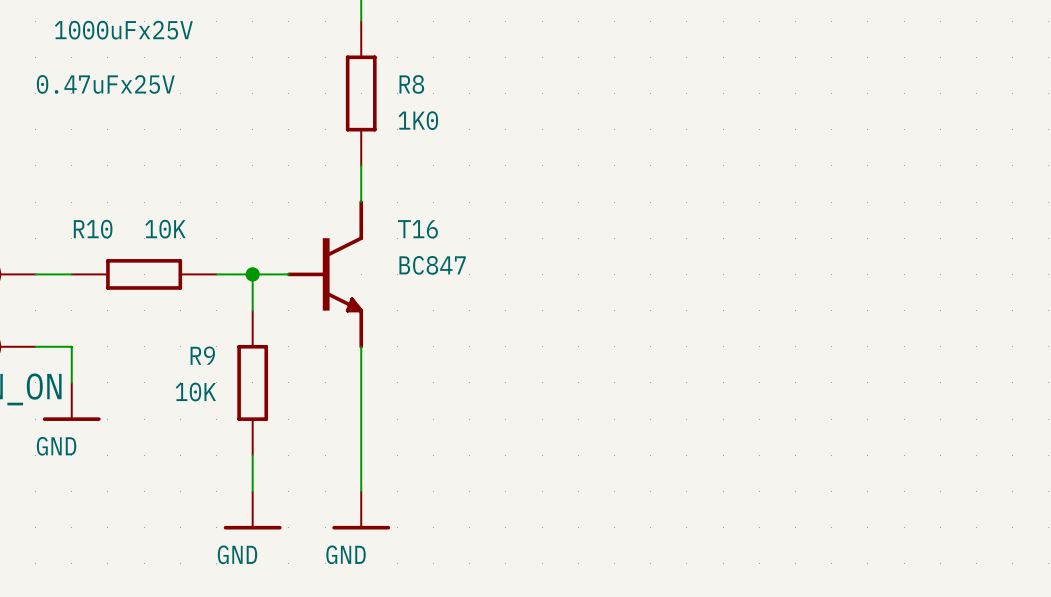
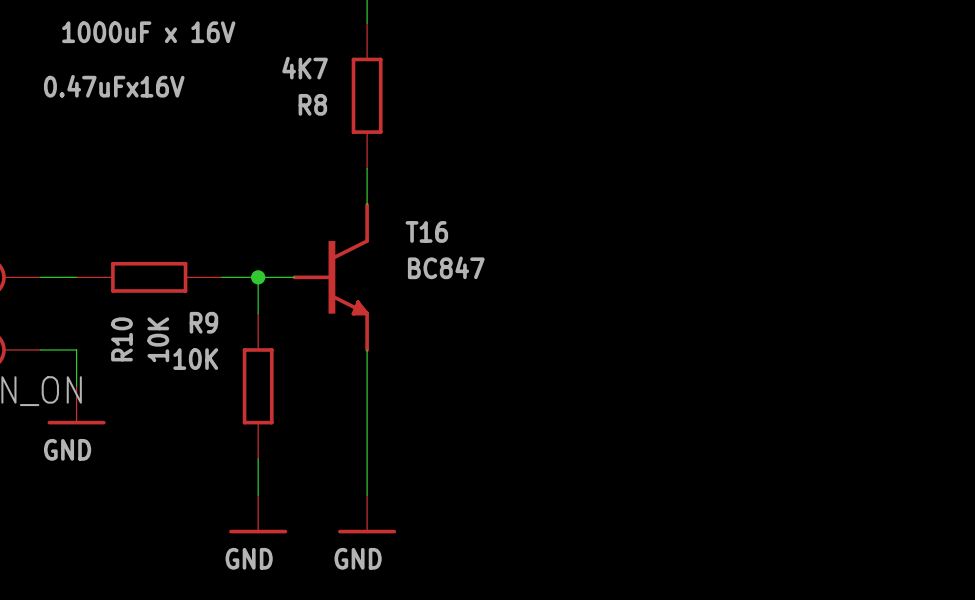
part value: 1000uFx25V (123, 30) -> 1000uF x 16V (148, 32)
part value: 0.47uFx25V (105, 84) -> 0.47uFx16V (114, 86)
R8 name position: R8 (411, 84) -> R8 (312, 104)
R8 value: 1K0 (418, 120) -> 4K7 (305, 68)
R10 name rotation: 0° (93, 229) -> 90° counterclockwise (121, 339)
R10 name position: R10 (93, 229) -> R10 (121, 339)
R10 value rotation: 0° (165, 229) -> 90° counterclockwise (158, 339)
R10 value position: 10K (165, 229) -> 10K (158, 339)
R9 name position: R9 (202, 355) -> R9 (203, 322)
R9 value position: 10K (195, 392) -> 10K (195, 359)

